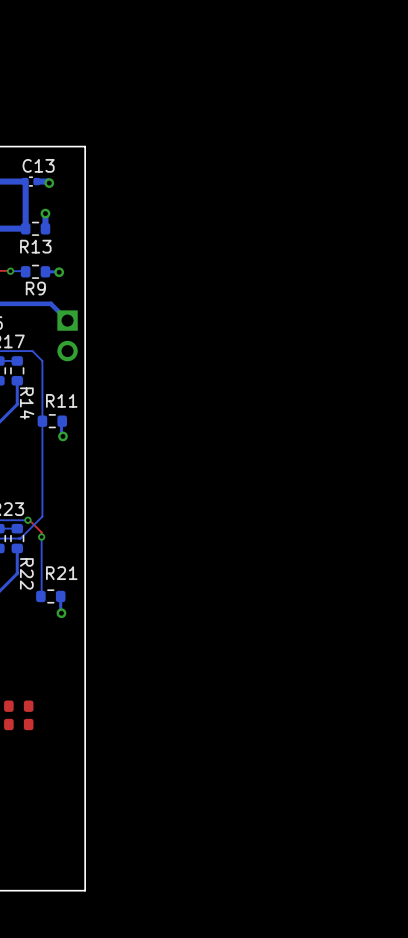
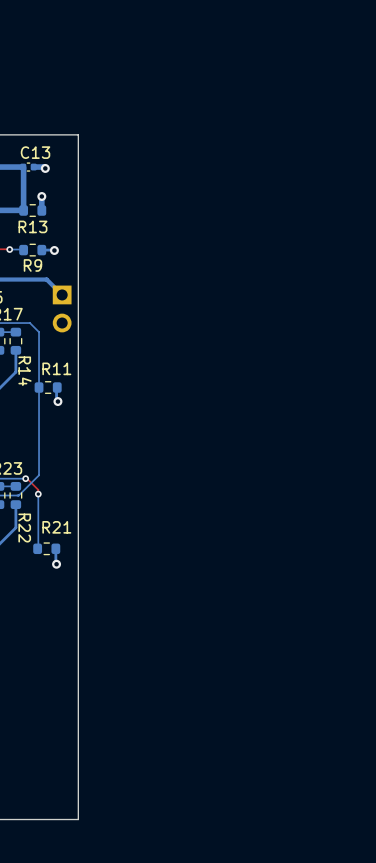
part: (18, 706) -> none
part: (18, 724) -> none

